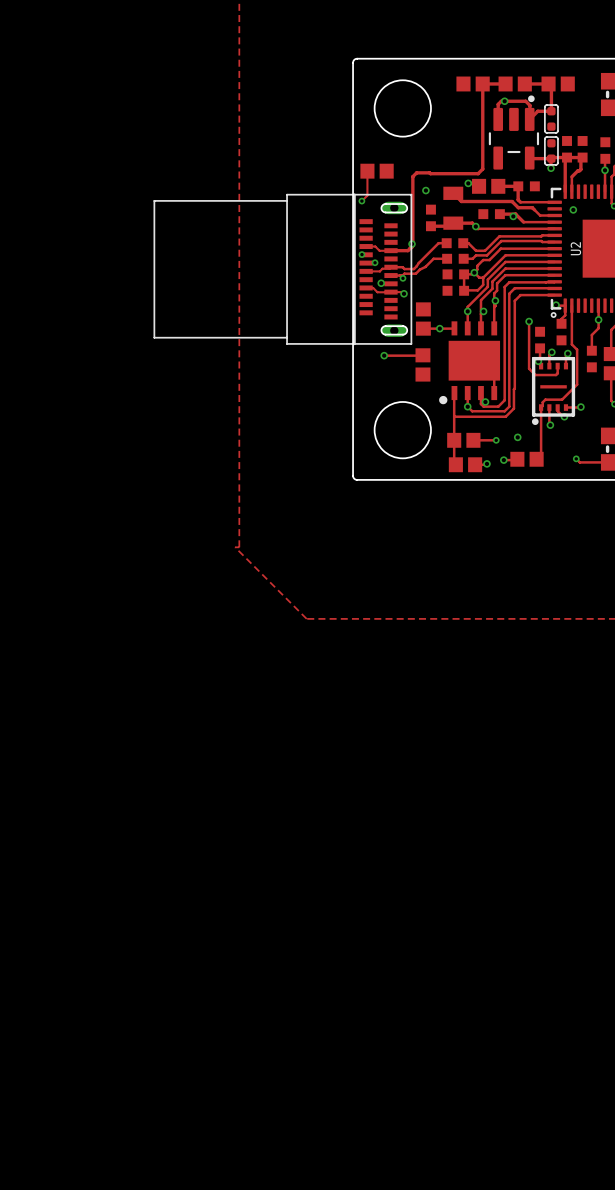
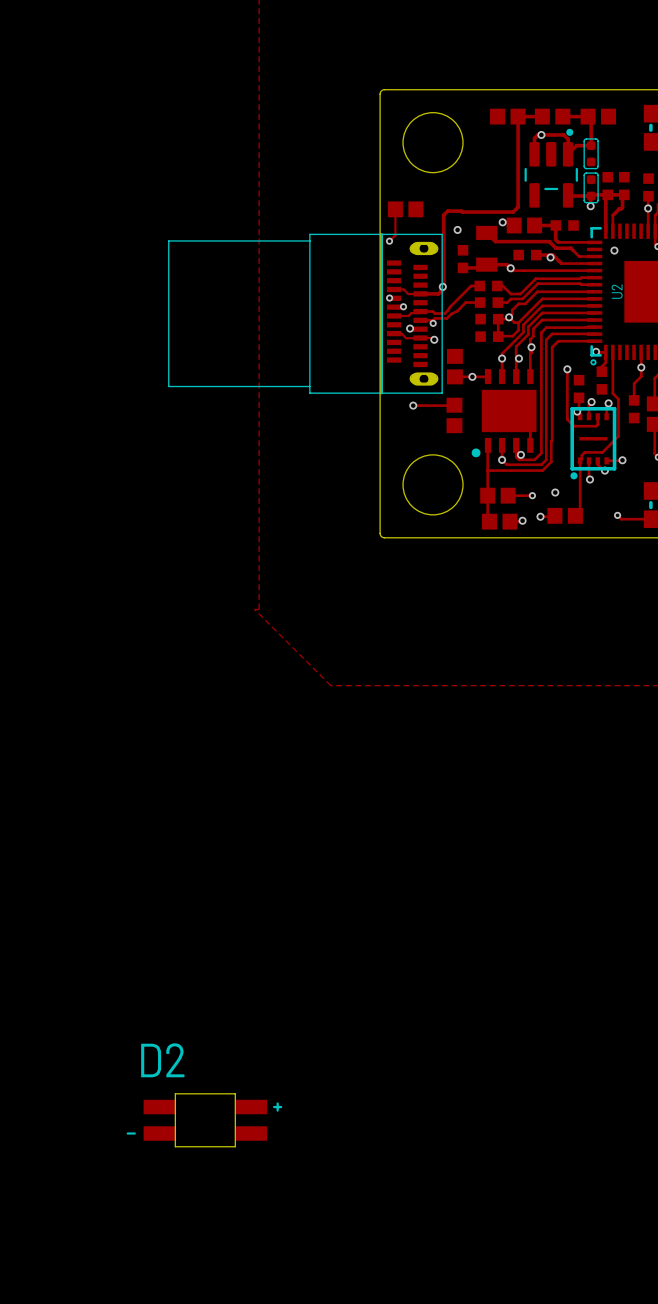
D2: none -> (204, 1120)

